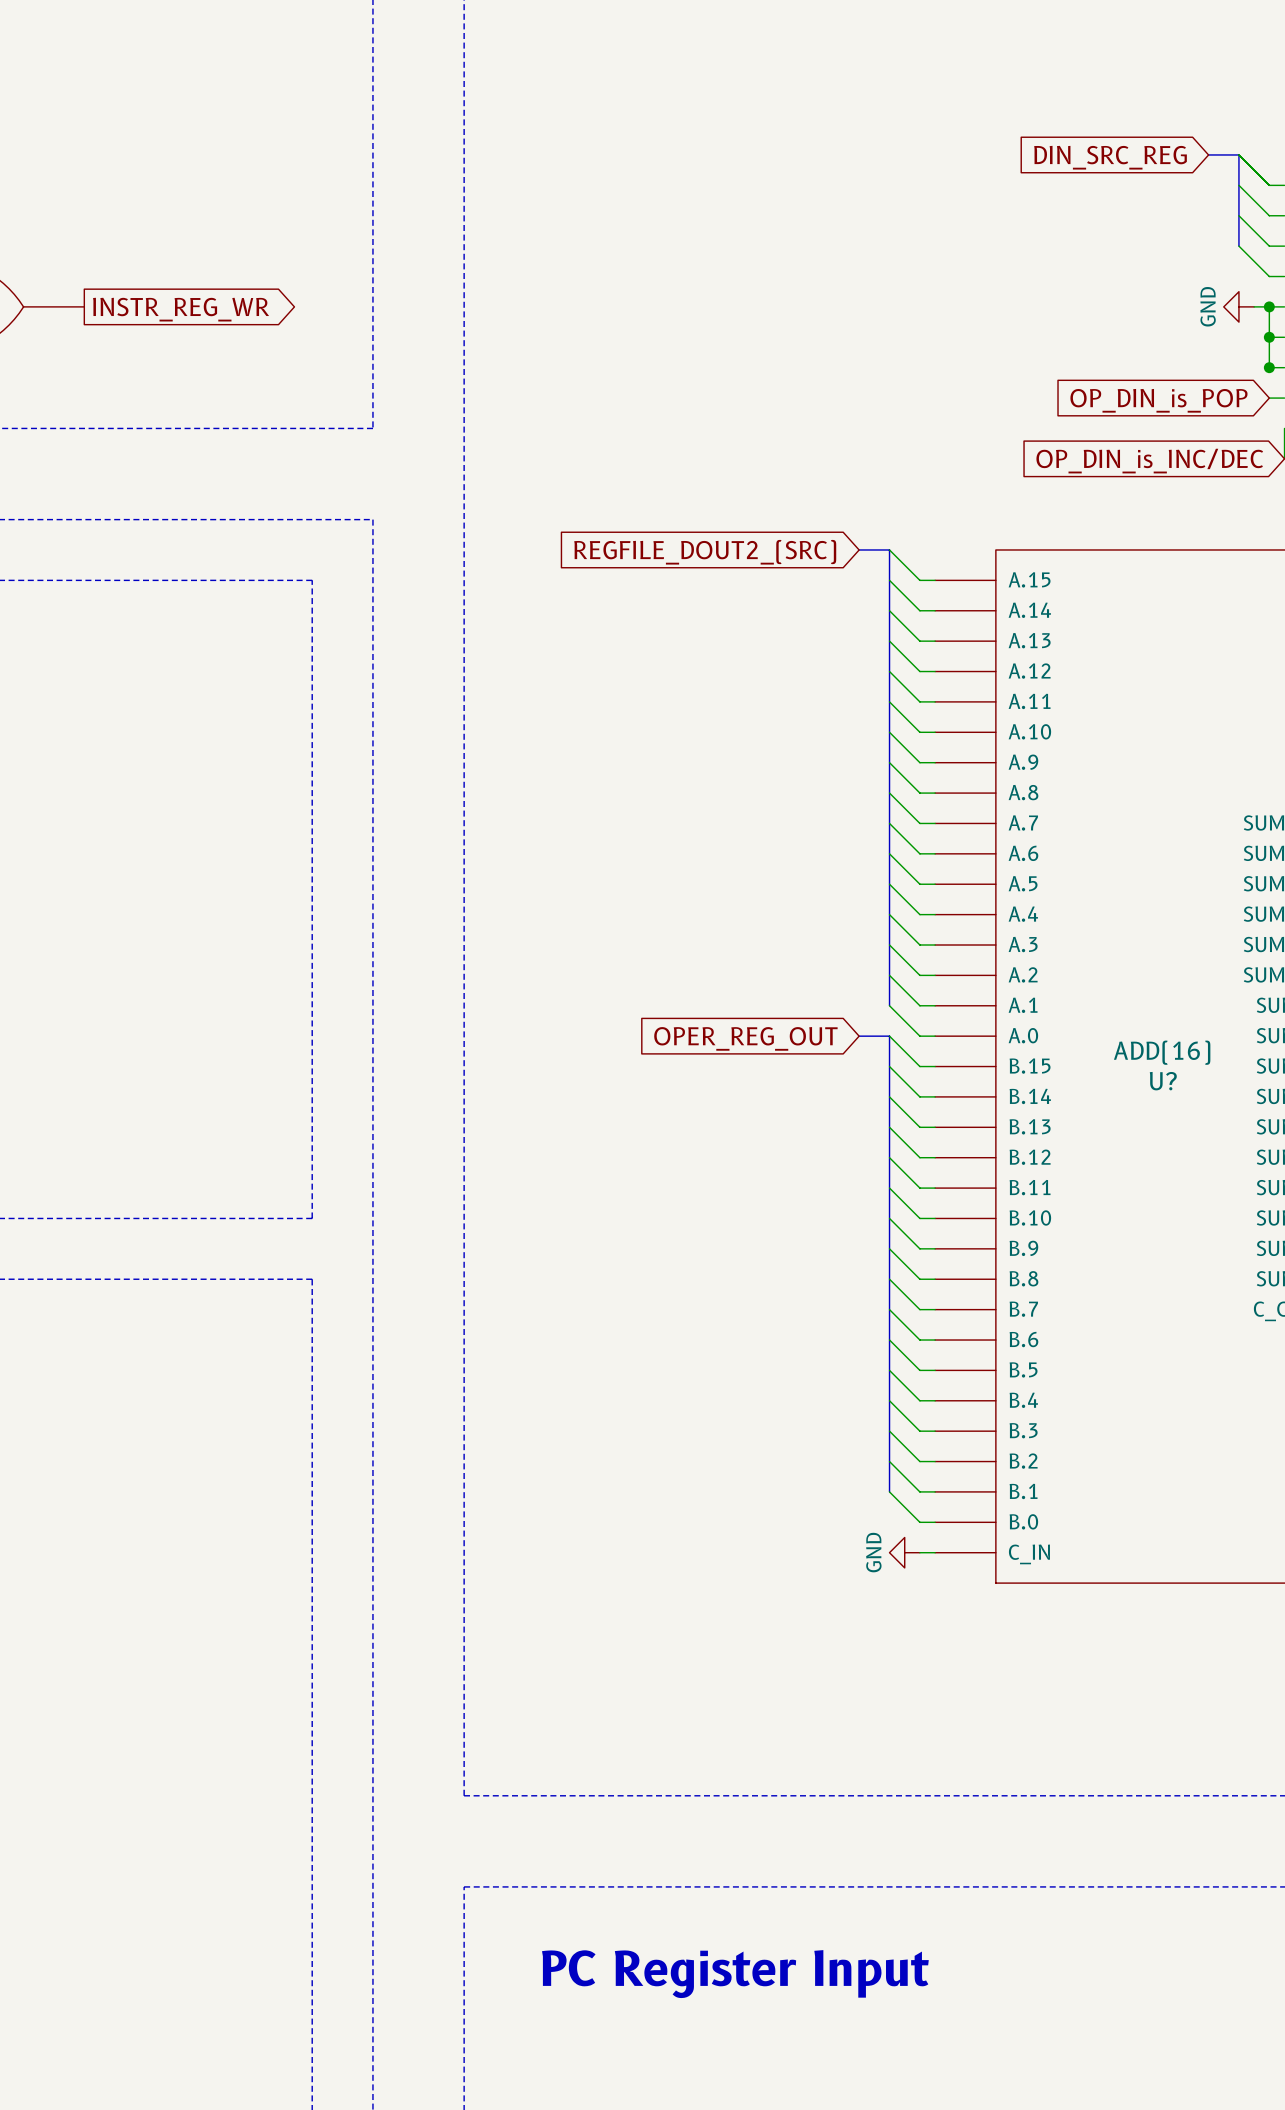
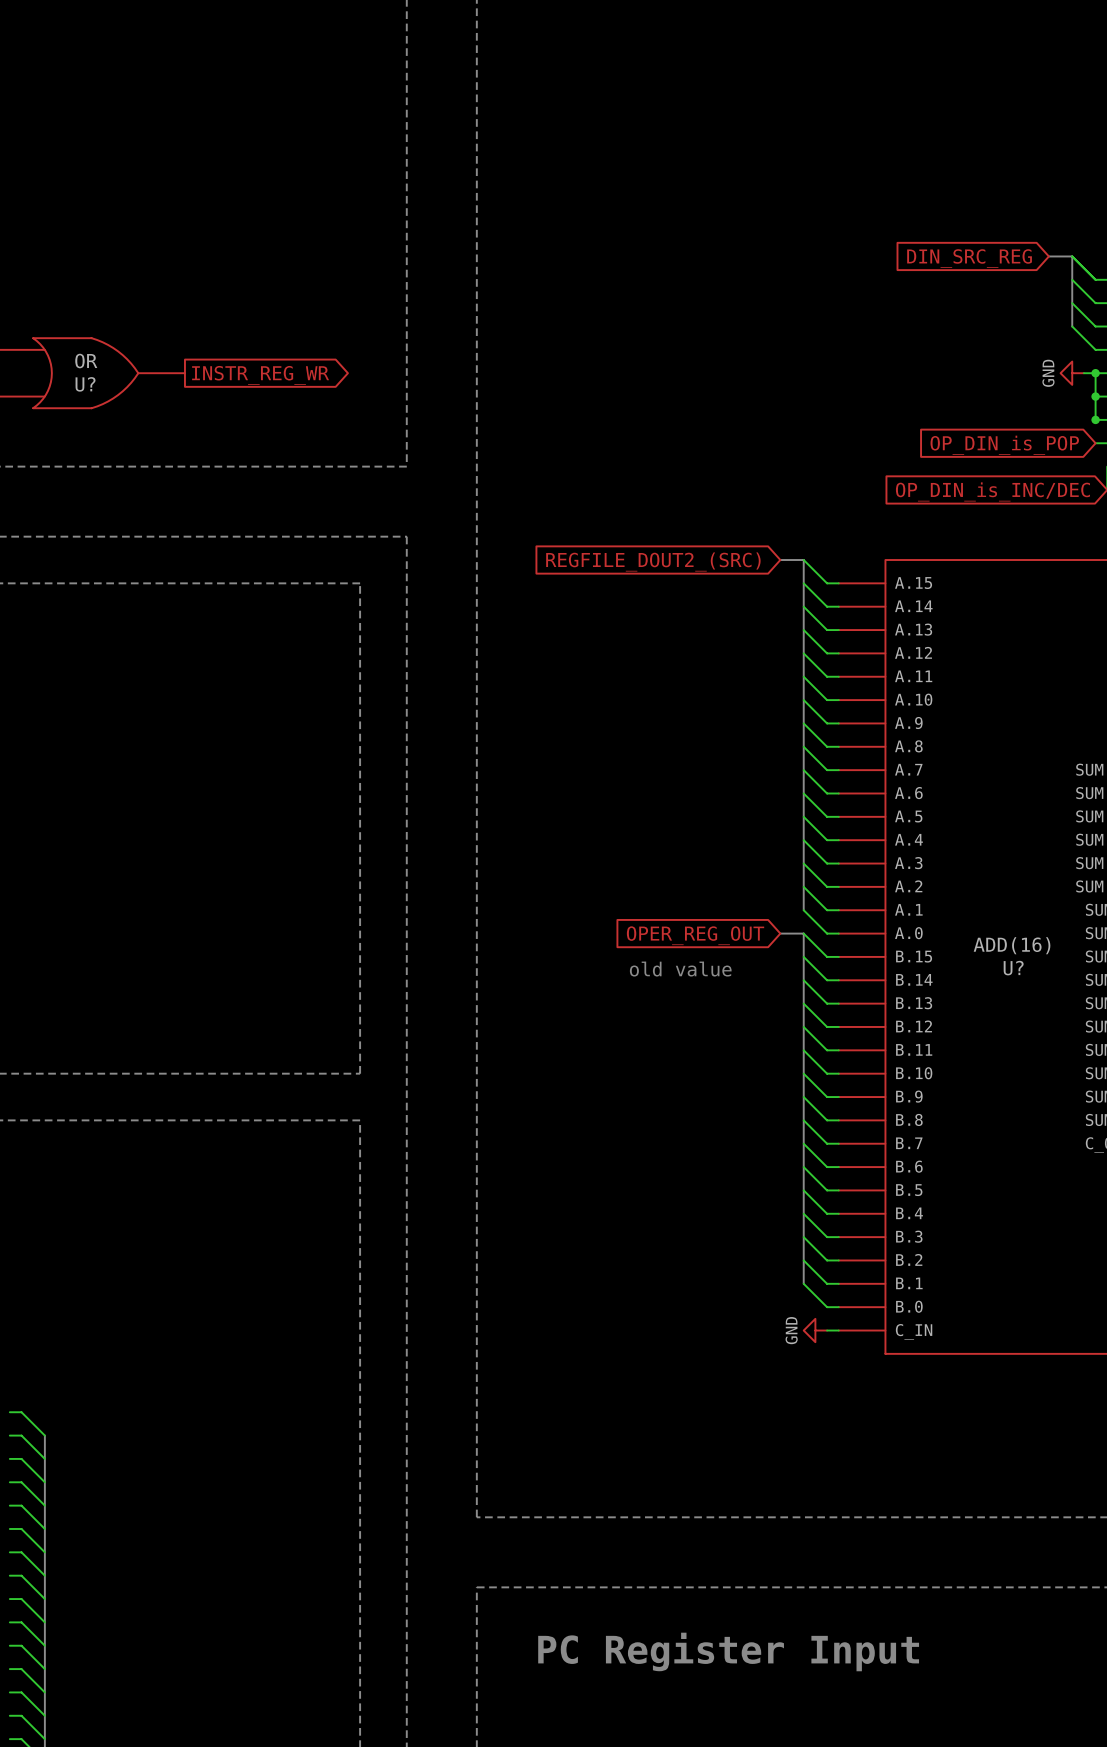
text: none -> old value (680, 969)

